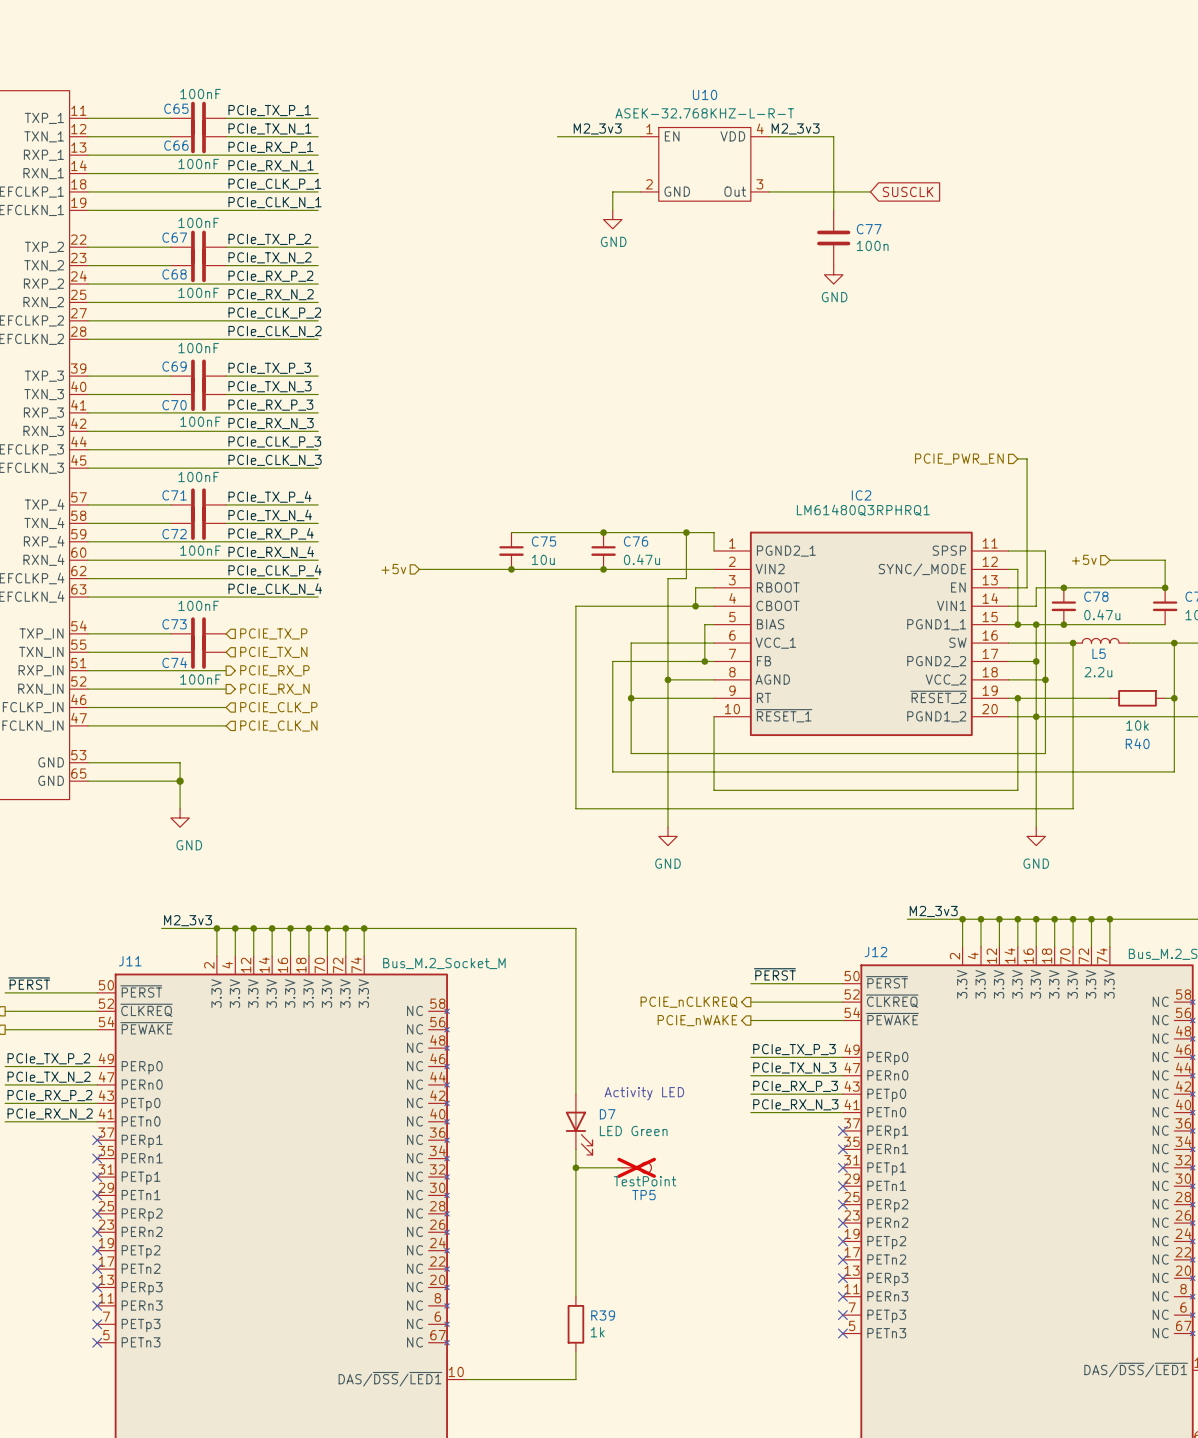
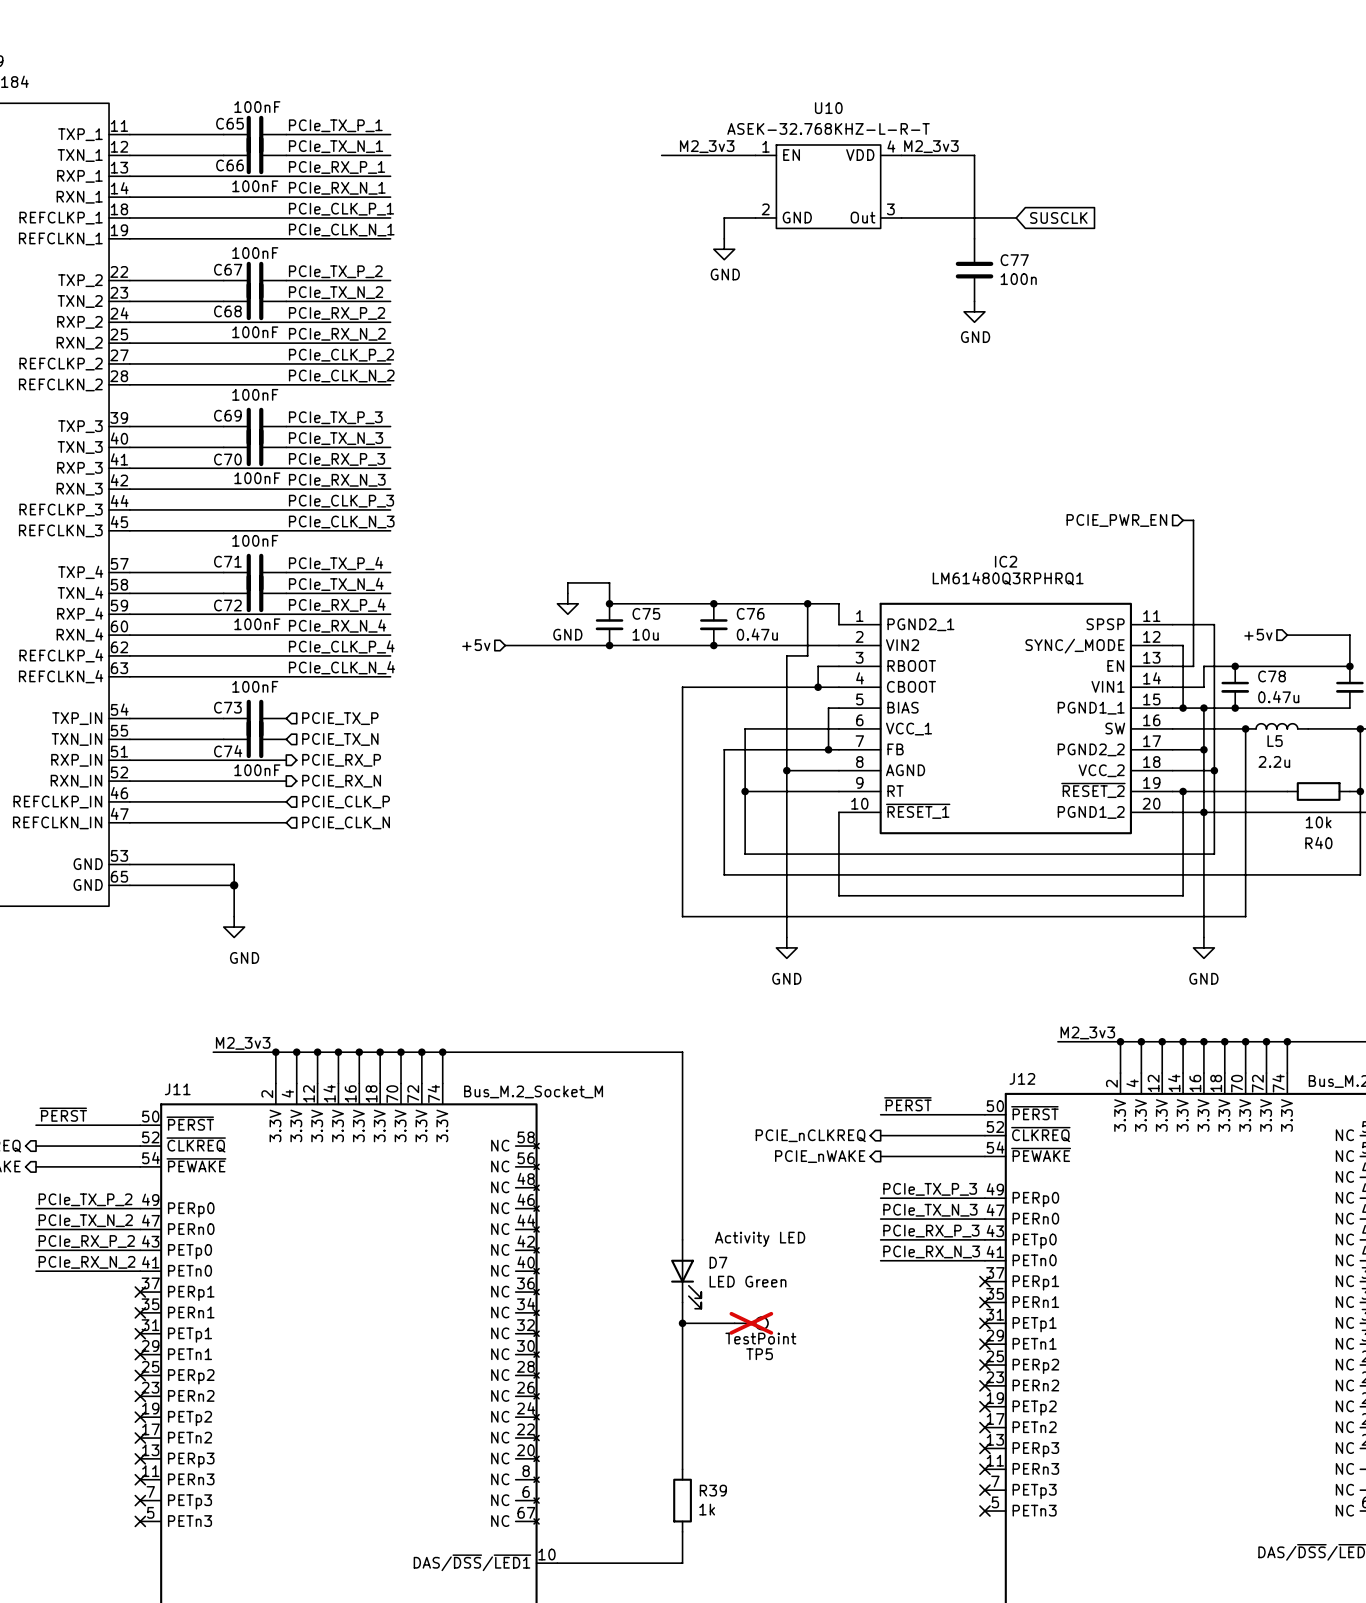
wire: none -> (567, 593) (567, 582) (609, 582) (609, 603)
power symbol: none -> GND (567, 603)
junction: none -> (609, 603)

